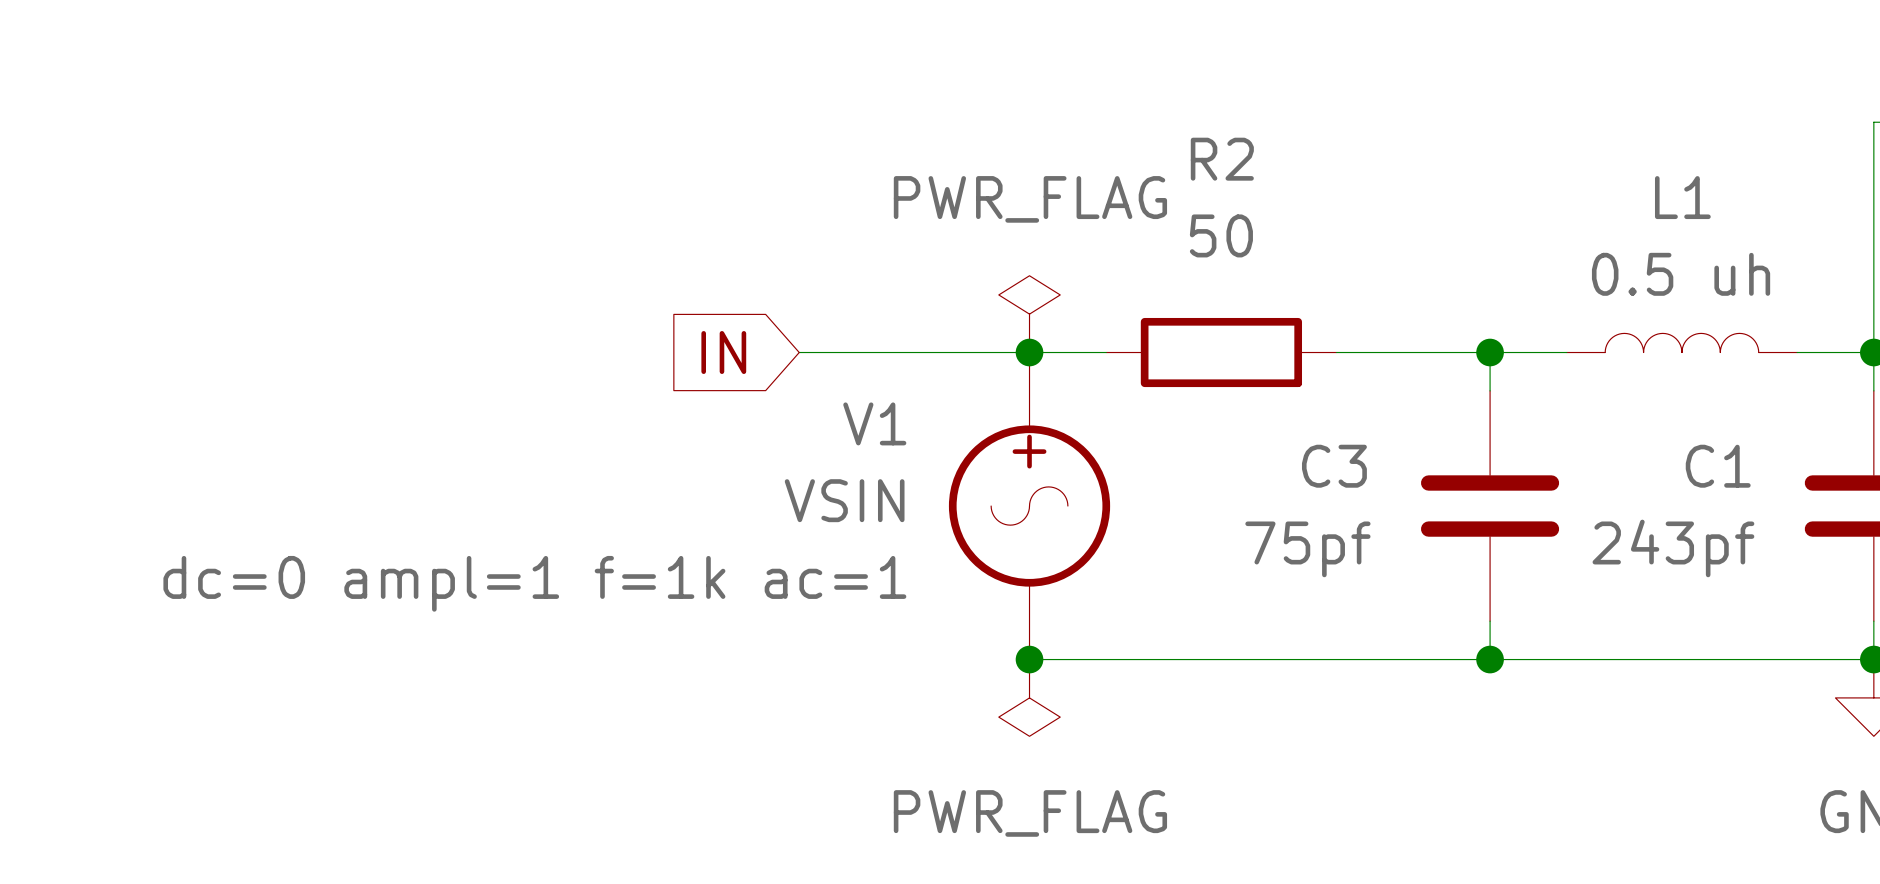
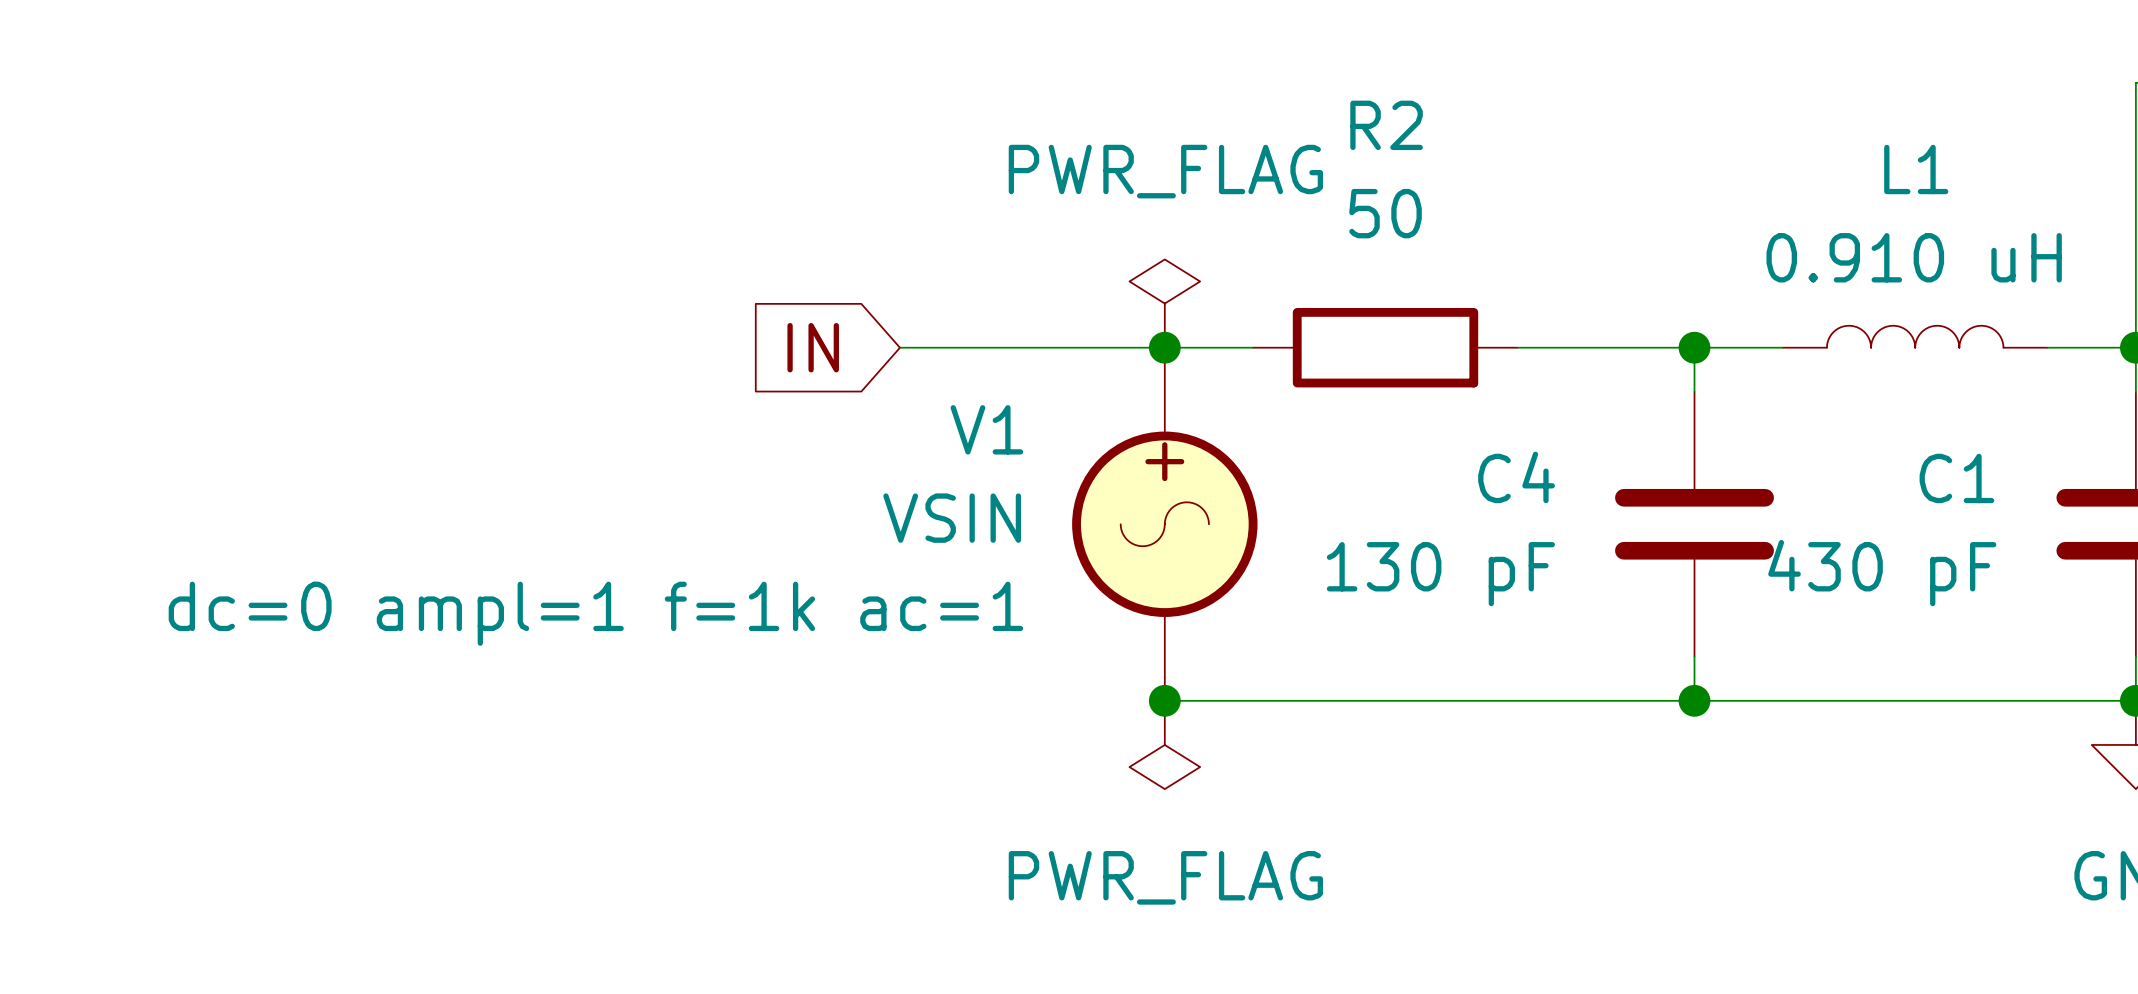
L1 value: 0.5 uh (1681, 274) -> 0.910 uH (1914, 257)
C3 name: C3 (1334, 466) -> C4 (1516, 477)
C1 value: 243pf (1673, 548) -> 430 pF (1882, 573)
C3 value: 75pf (1307, 549) -> 130 pF (1440, 574)

